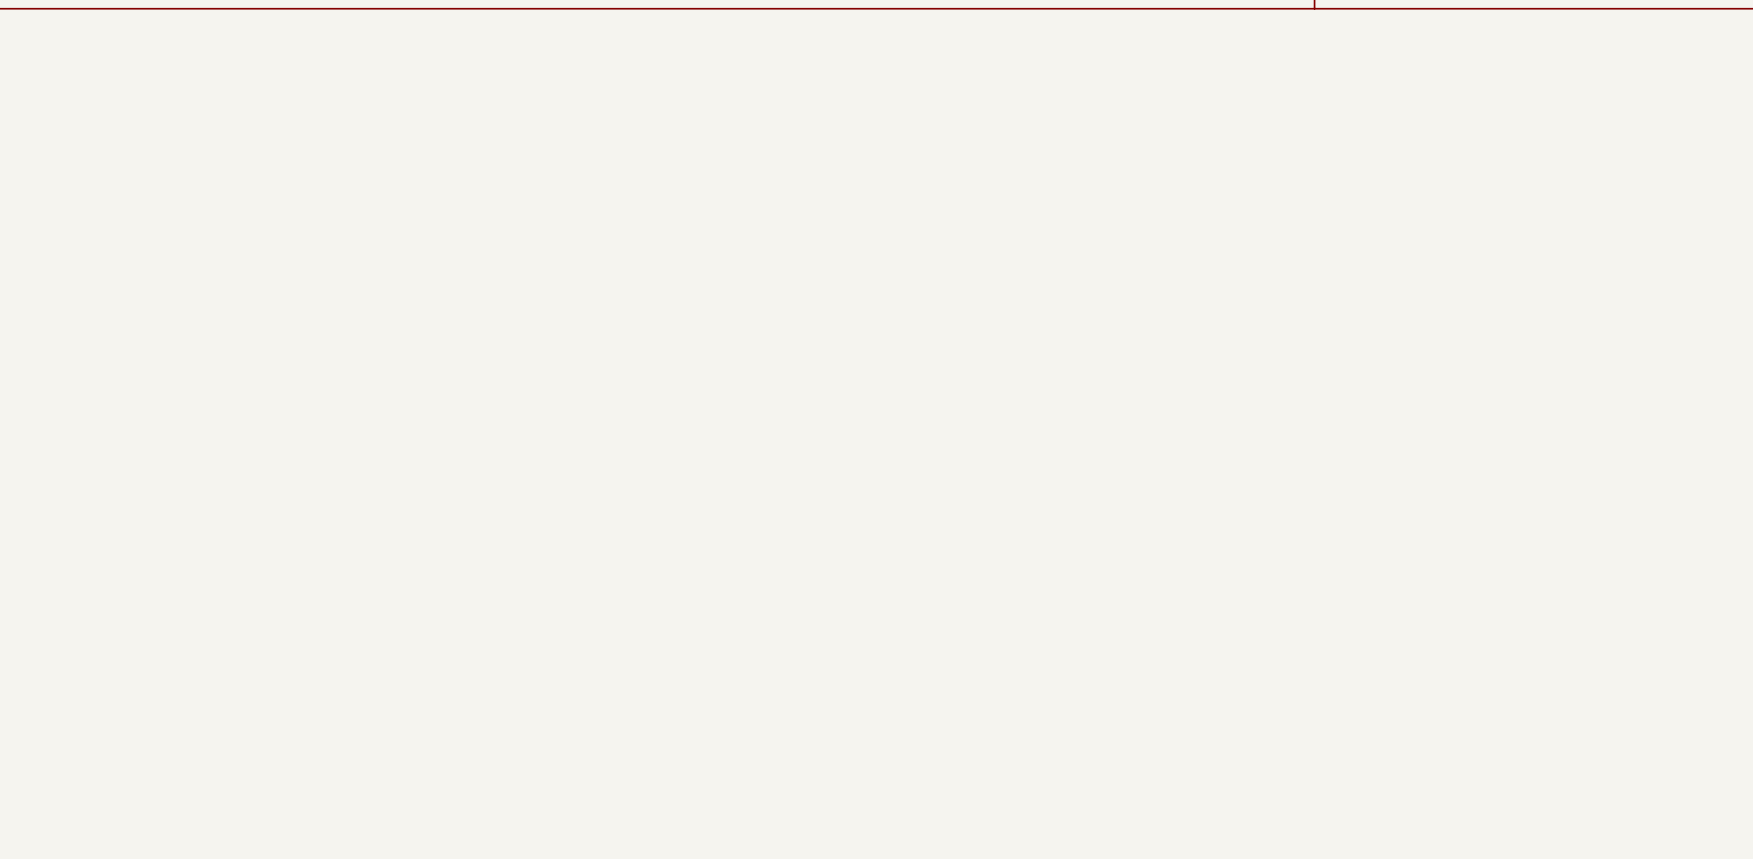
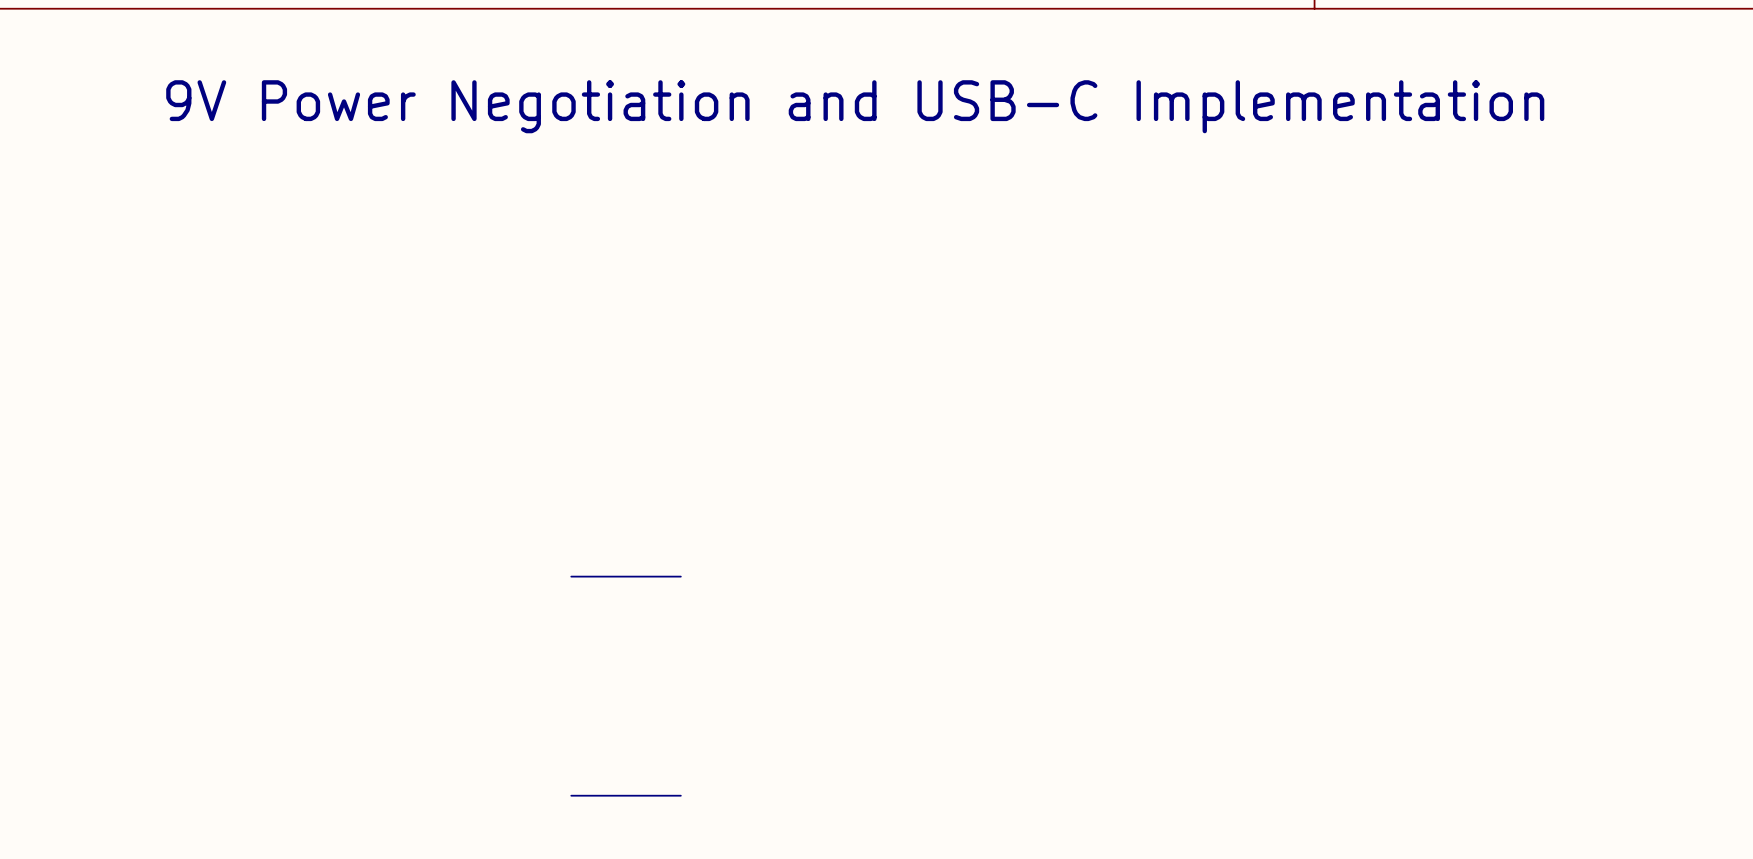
text: none -> 9V Power Negotiation and USB-C Implementation (855, 106)
wire: none -> (571, 576) (680, 576)
wire: none -> (571, 795) (680, 795)

